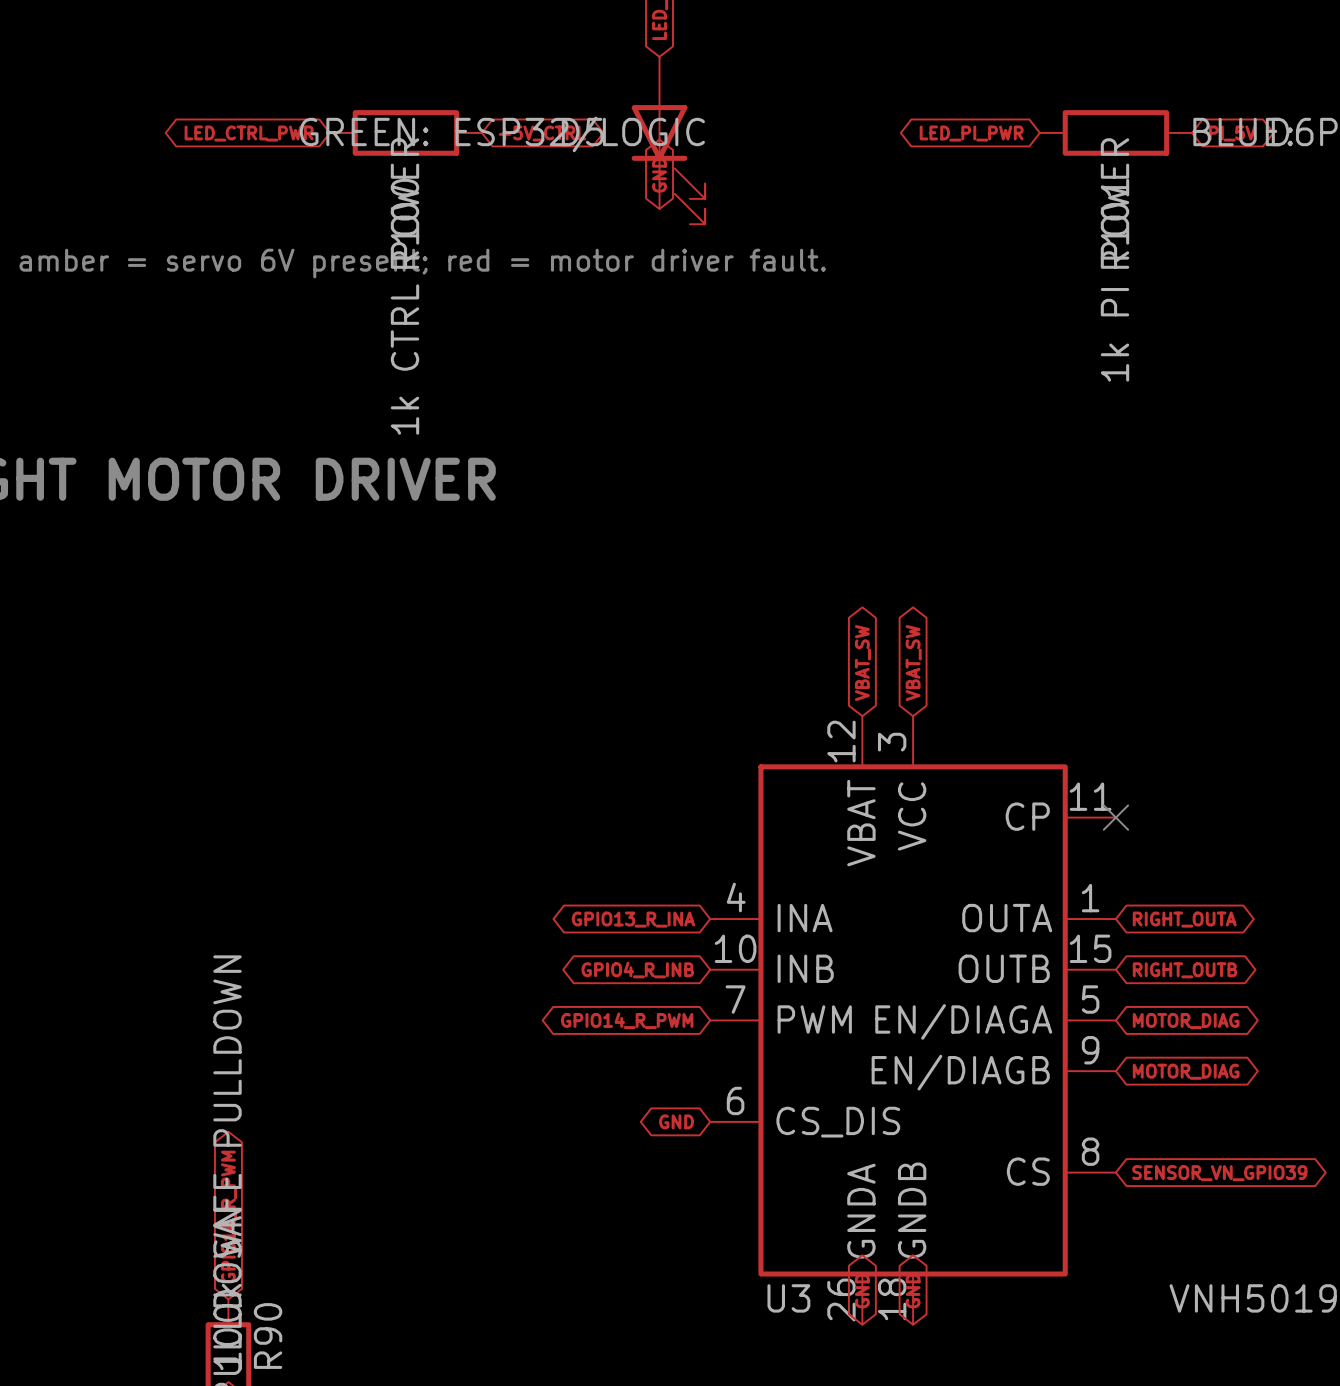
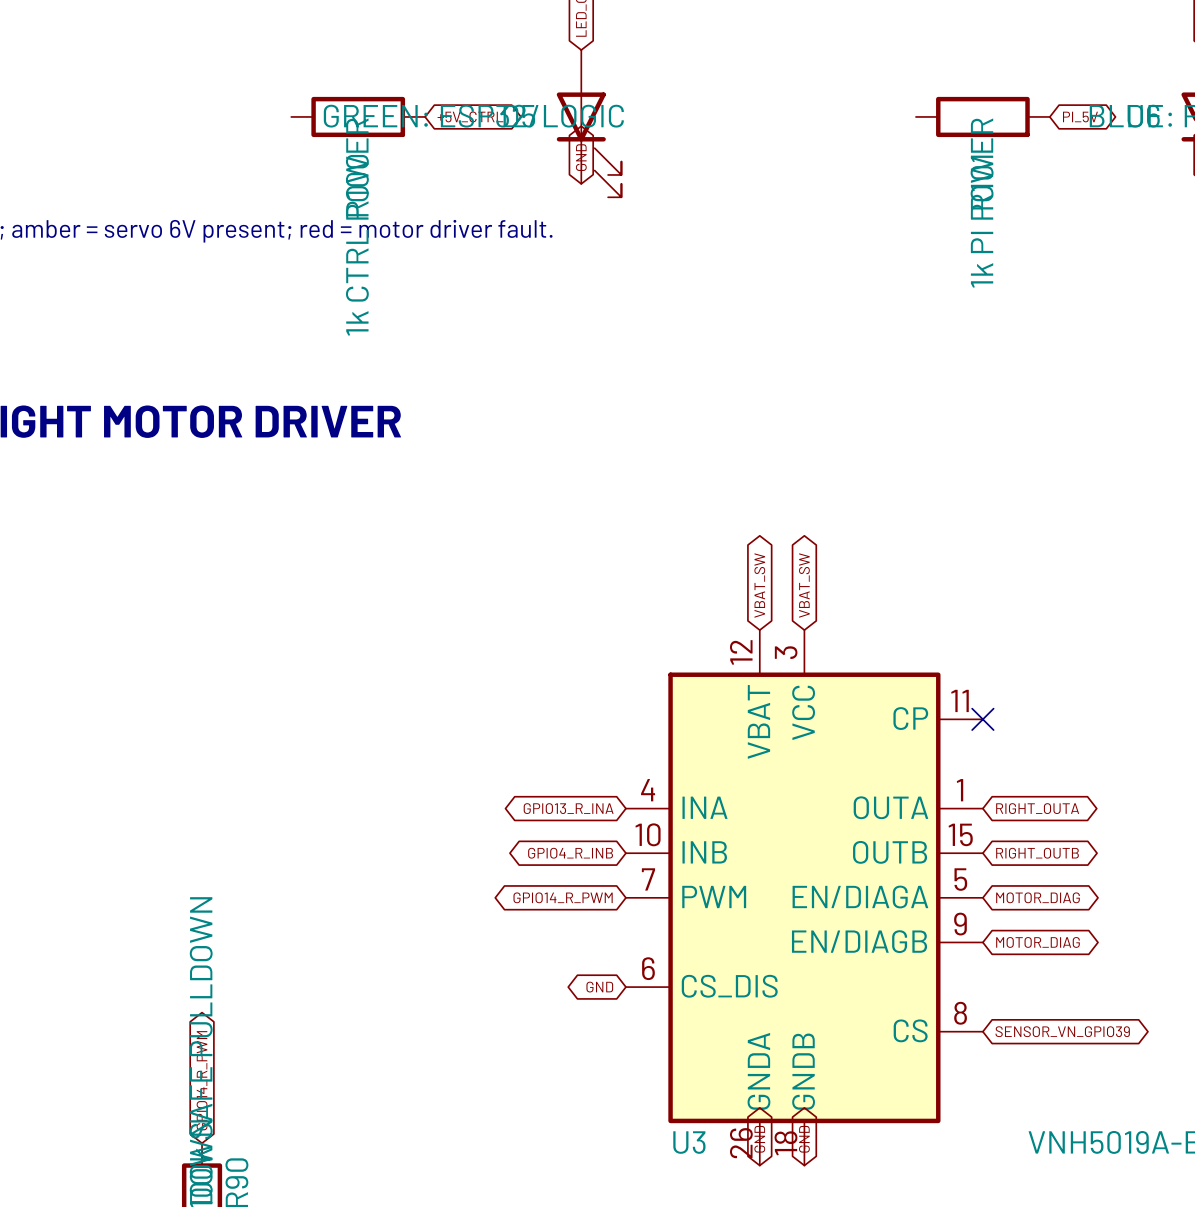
global label: LED_CTRL_PWR (249, 133) -> none
global label: LED_PI_PWR (971, 133) -> none

